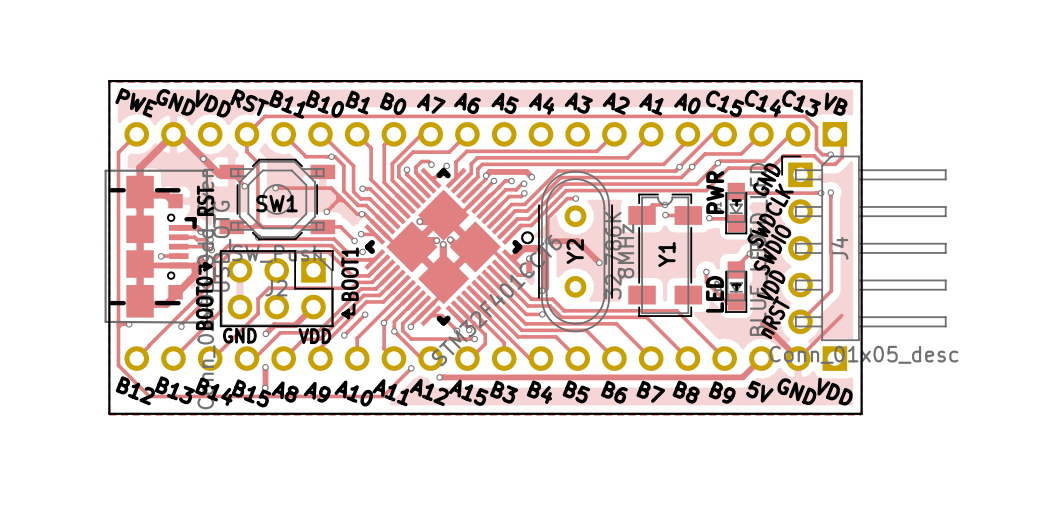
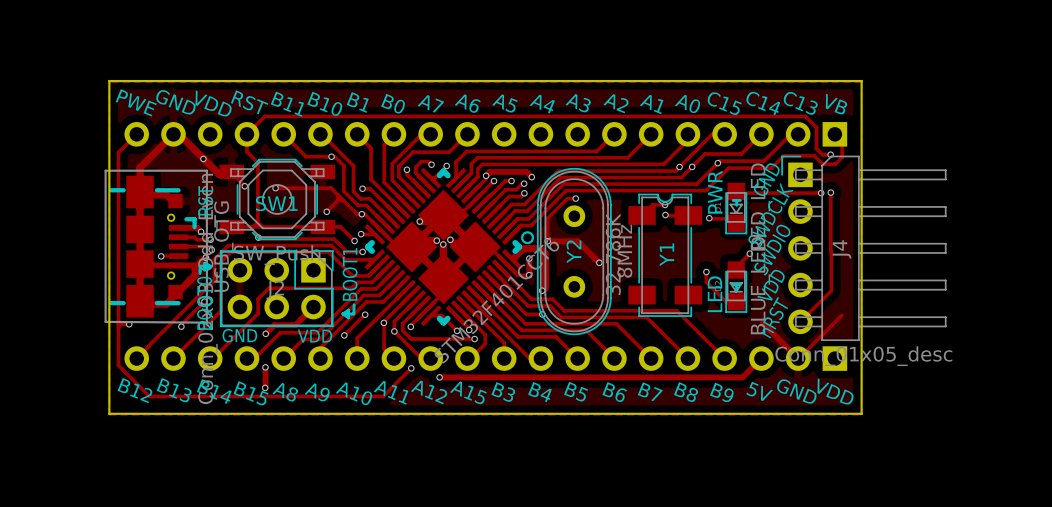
Y2 footprint: [538, 170, 613, 333] -> [536, 167, 612, 336]
Y1 footprint: [628, 193, 703, 317] -> [628, 193, 703, 317]

